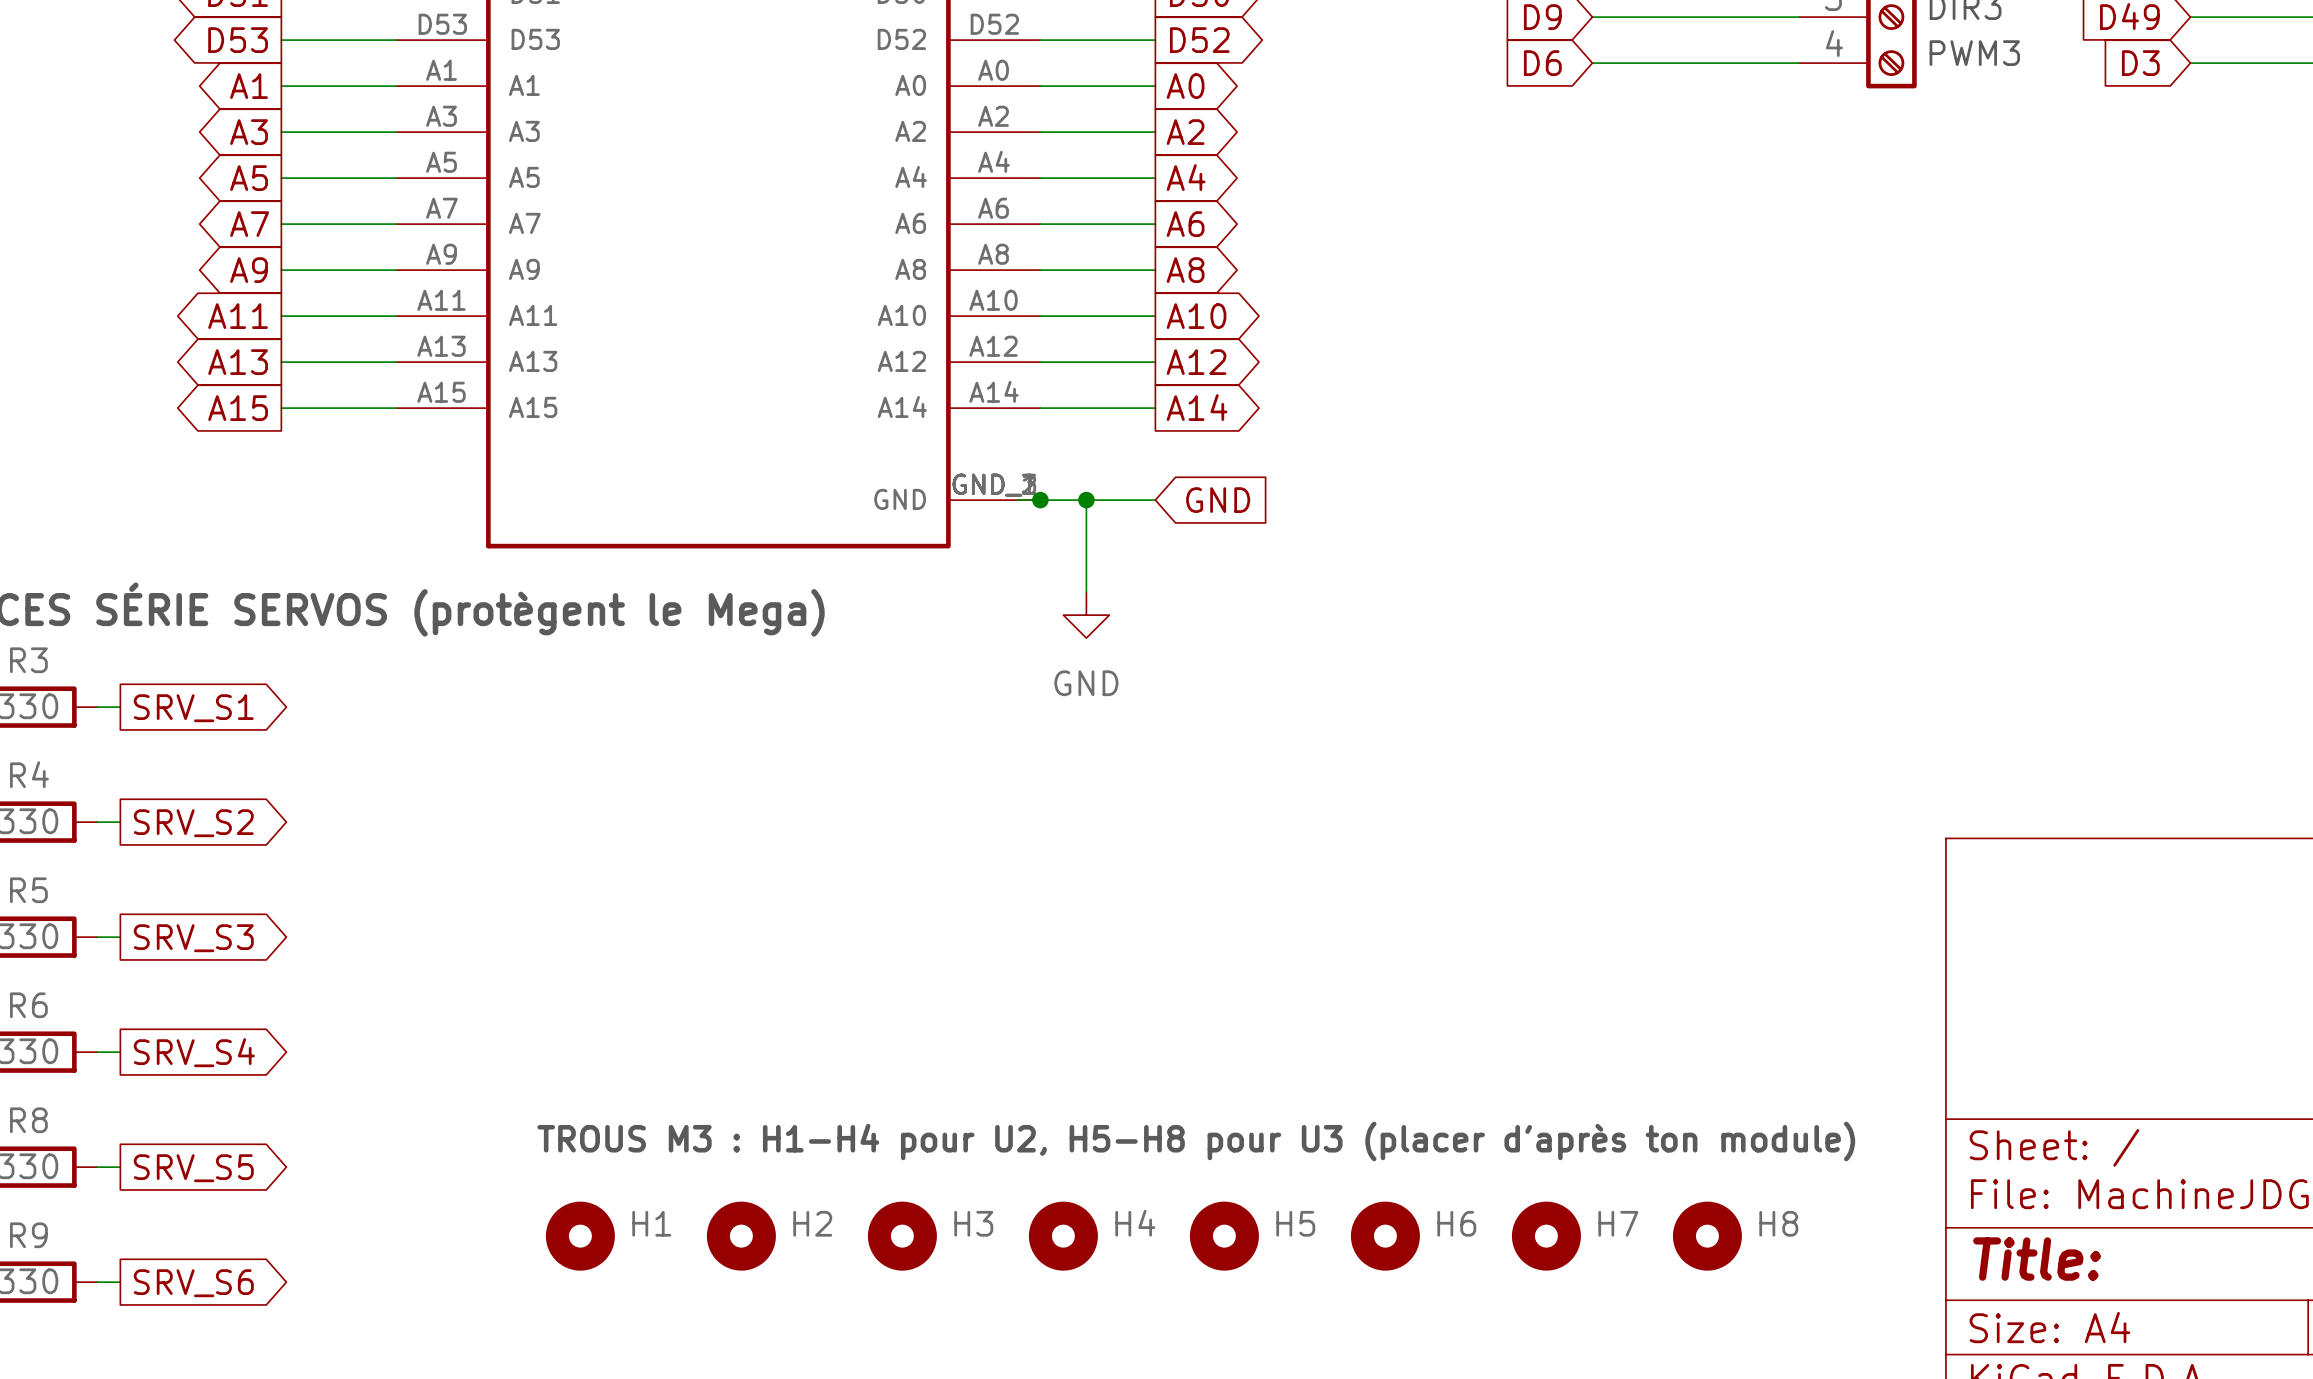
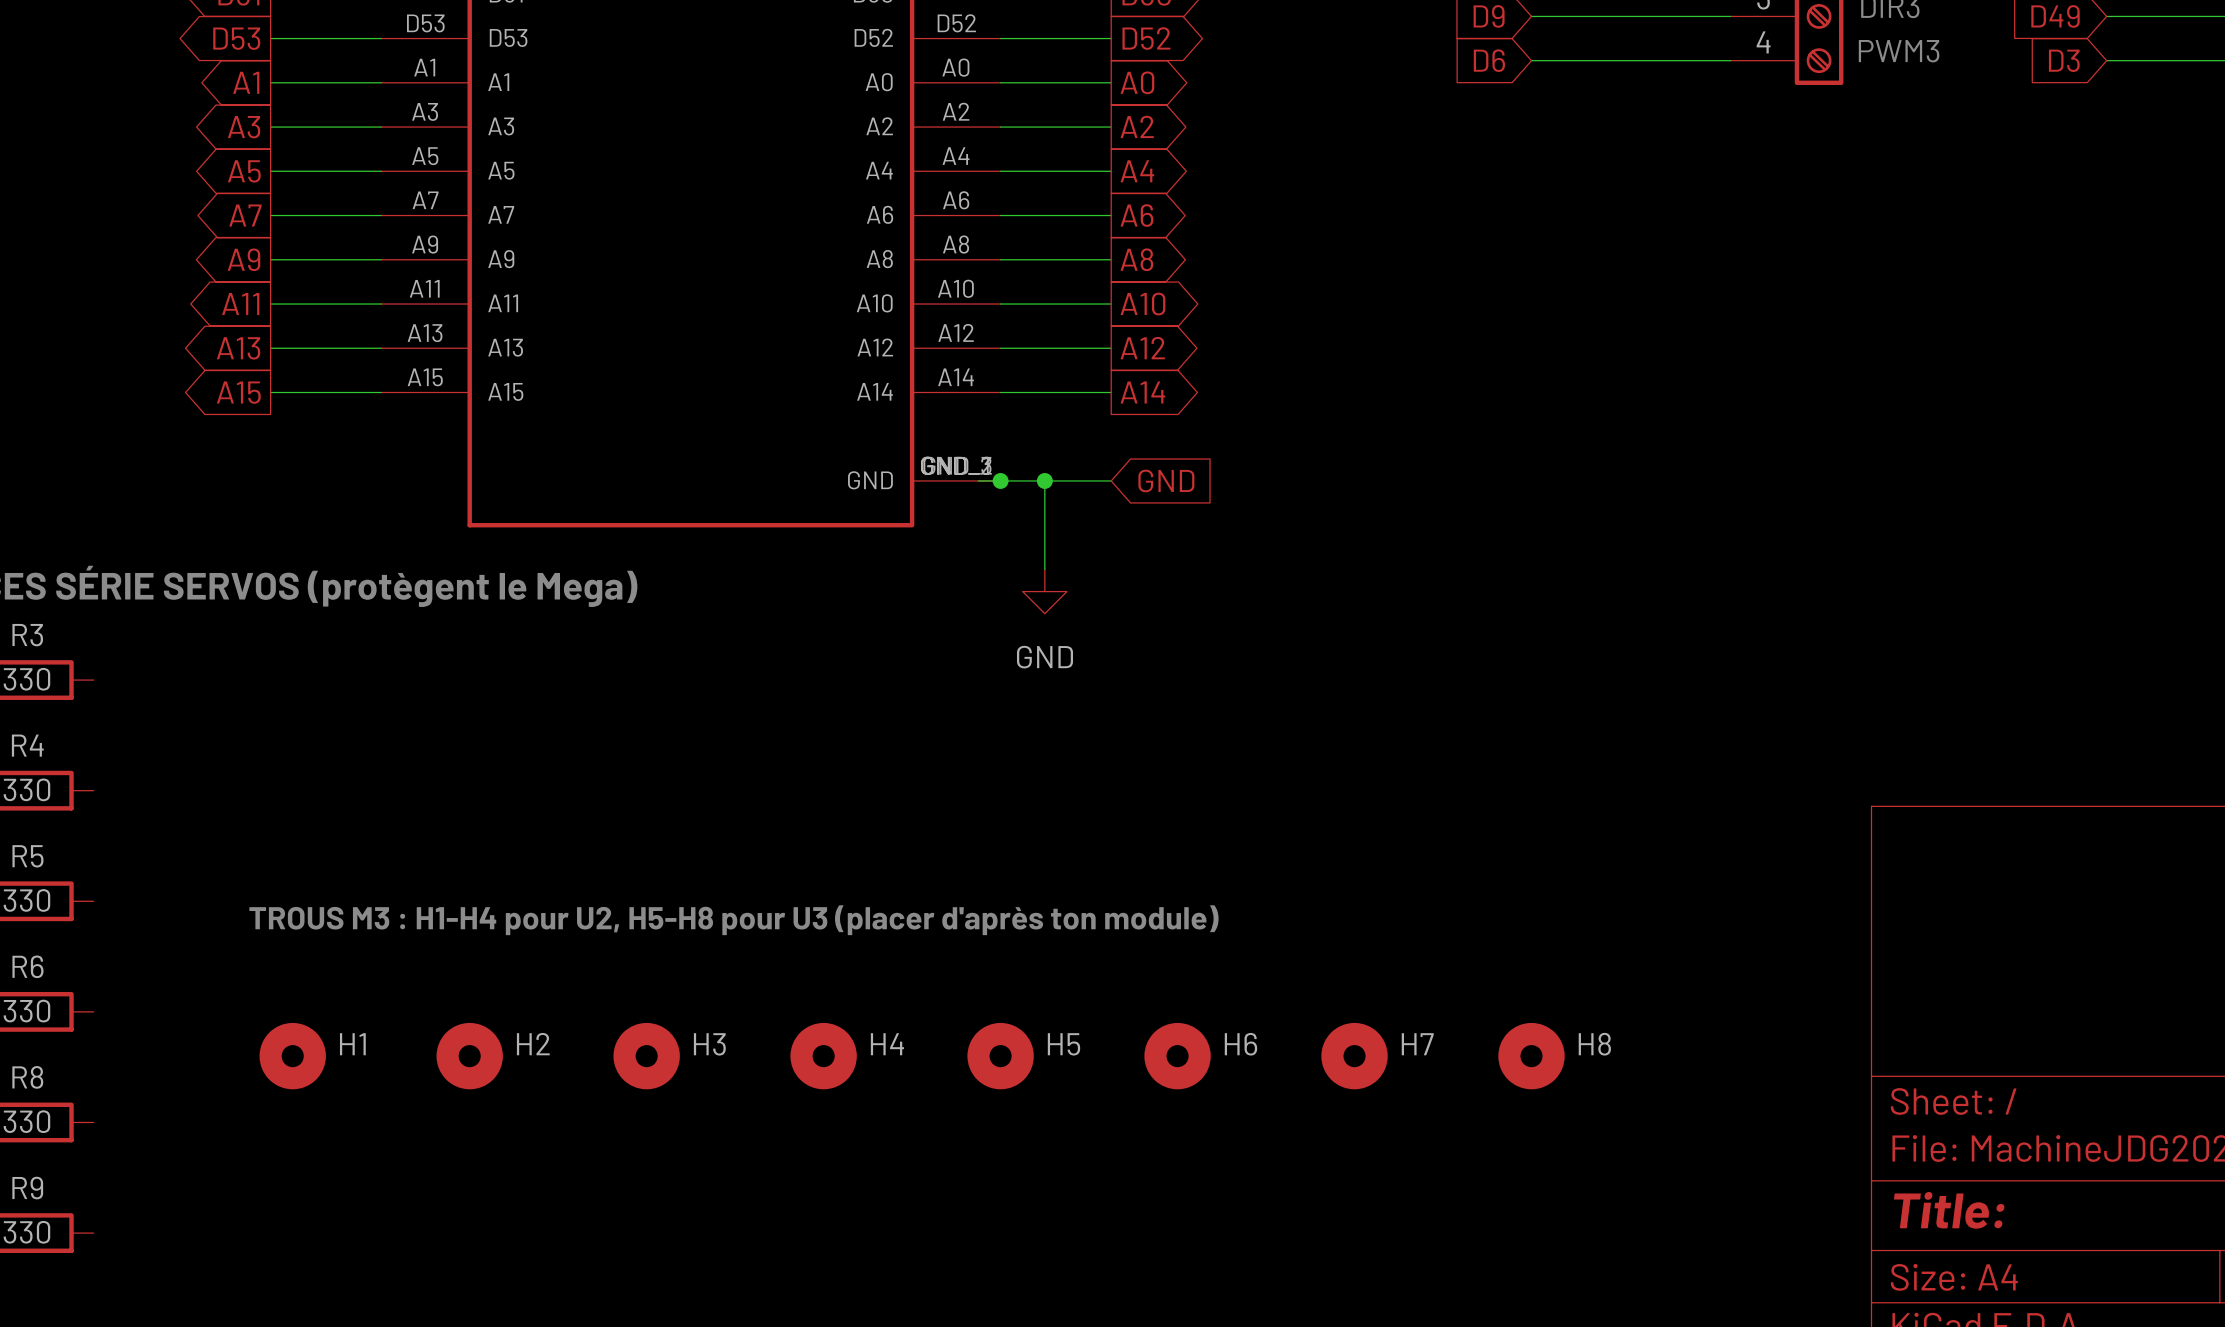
wire: (97, 707) (120, 707) -> none
global label: SRV_S1 (193, 708) -> none
wire: (97, 822) (120, 822) -> none
global label: SRV_S2 (193, 823) -> none
wire: (97, 937) (120, 937) -> none
global label: SRV_S3 (193, 938) -> none
wire: (97, 1052) (120, 1052) -> none
global label: SRV_S4 (194, 1052) -> none
text position: TROUS M3 : H1-H4 pour U2, H5-H8 pour U3 (placer d'après ton module) (1196, 1141) -> TROUS M3 : H1-H4 pour U2, H5-H8 pour U3 (placer d'après ton module) (733, 920)
wire: (97, 1167) (120, 1167) -> none
global label: SRV_S5 (193, 1168) -> none
H1 position: (580, 1236) -> (292, 1056)
H2 position: (741, 1236) -> (469, 1056)
H3 position: (902, 1236) -> (646, 1056)
H4 position: (1063, 1236) -> (823, 1056)
H5 position: (1224, 1236) -> (1000, 1056)
H6 position: (1385, 1236) -> (1177, 1056)
H7 position: (1546, 1236) -> (1354, 1056)
H8 position: (1707, 1236) -> (1531, 1056)
wire: (97, 1282) (120, 1282) -> none
global label: SRV_S6 (193, 1283) -> none

